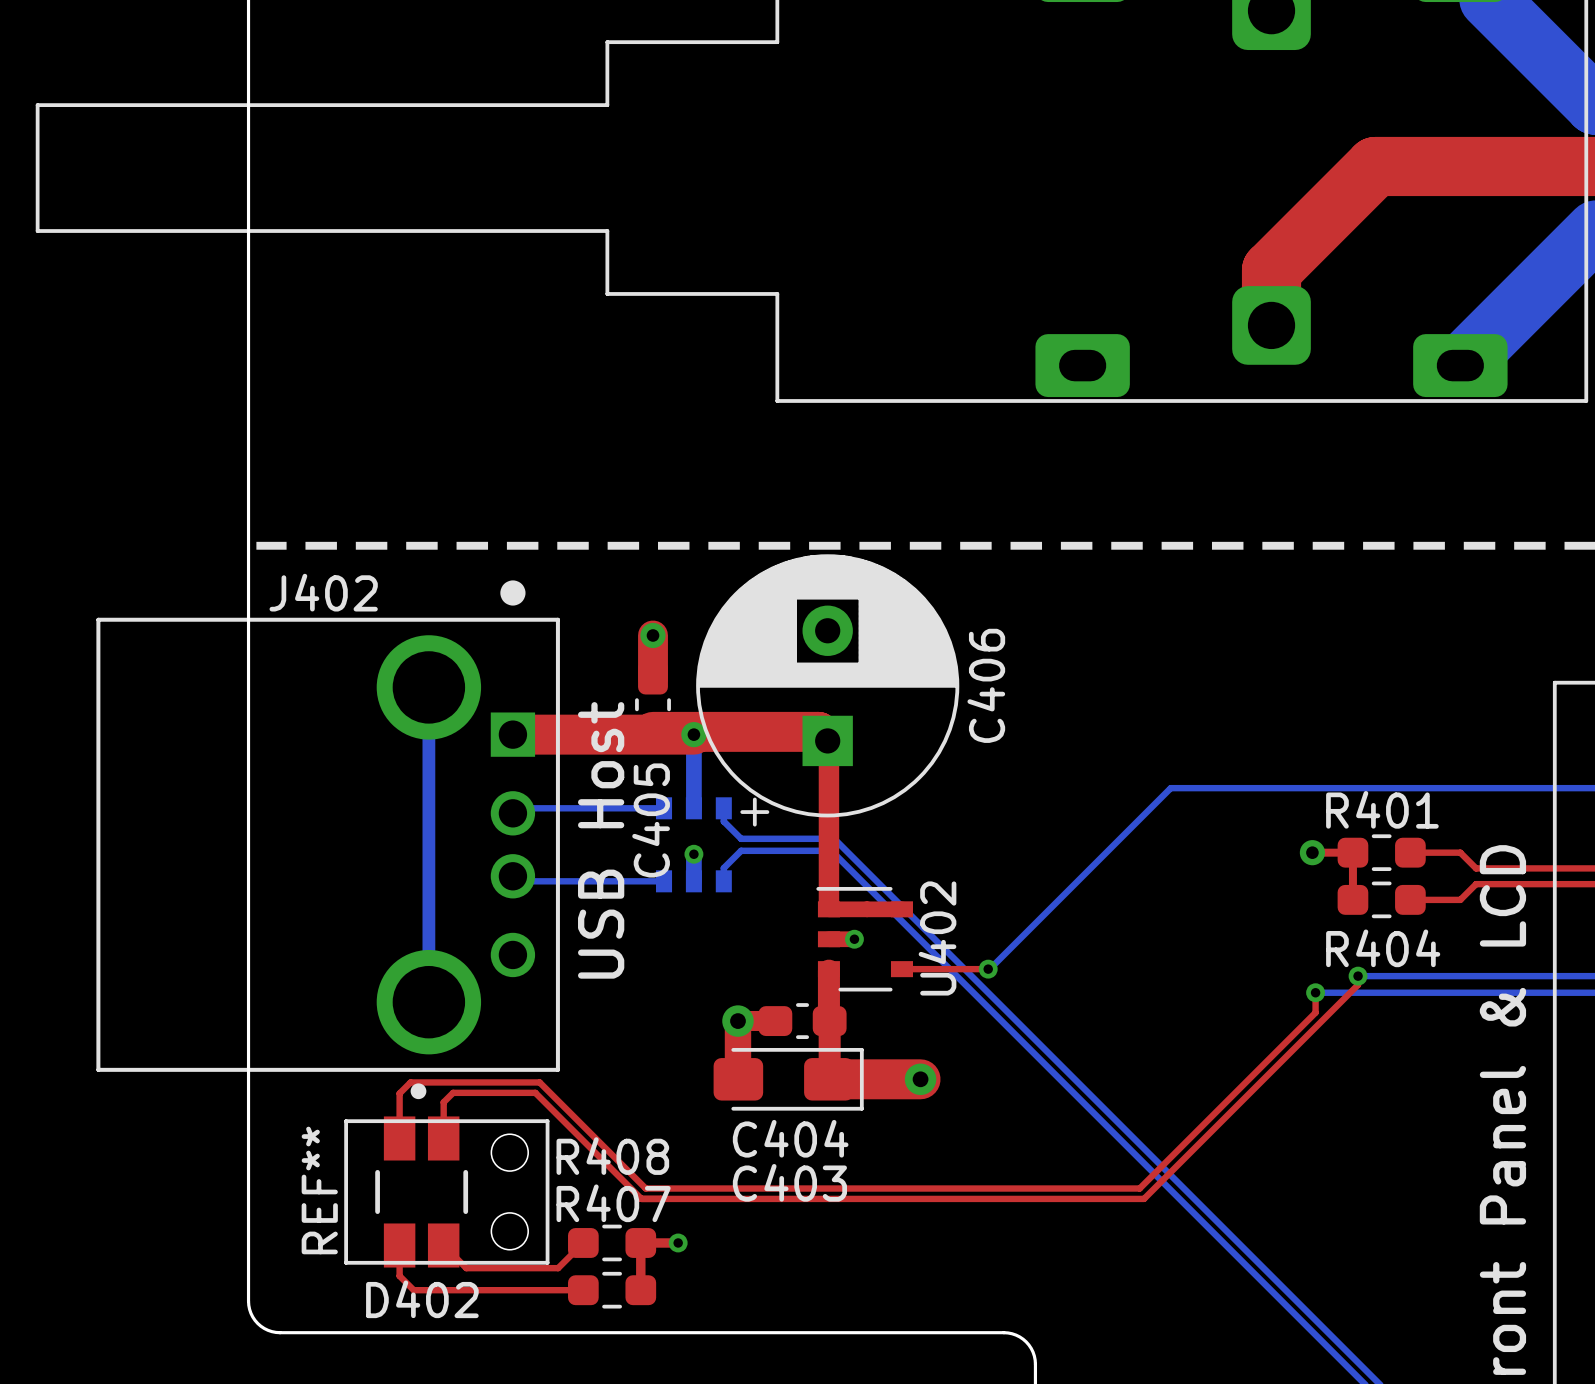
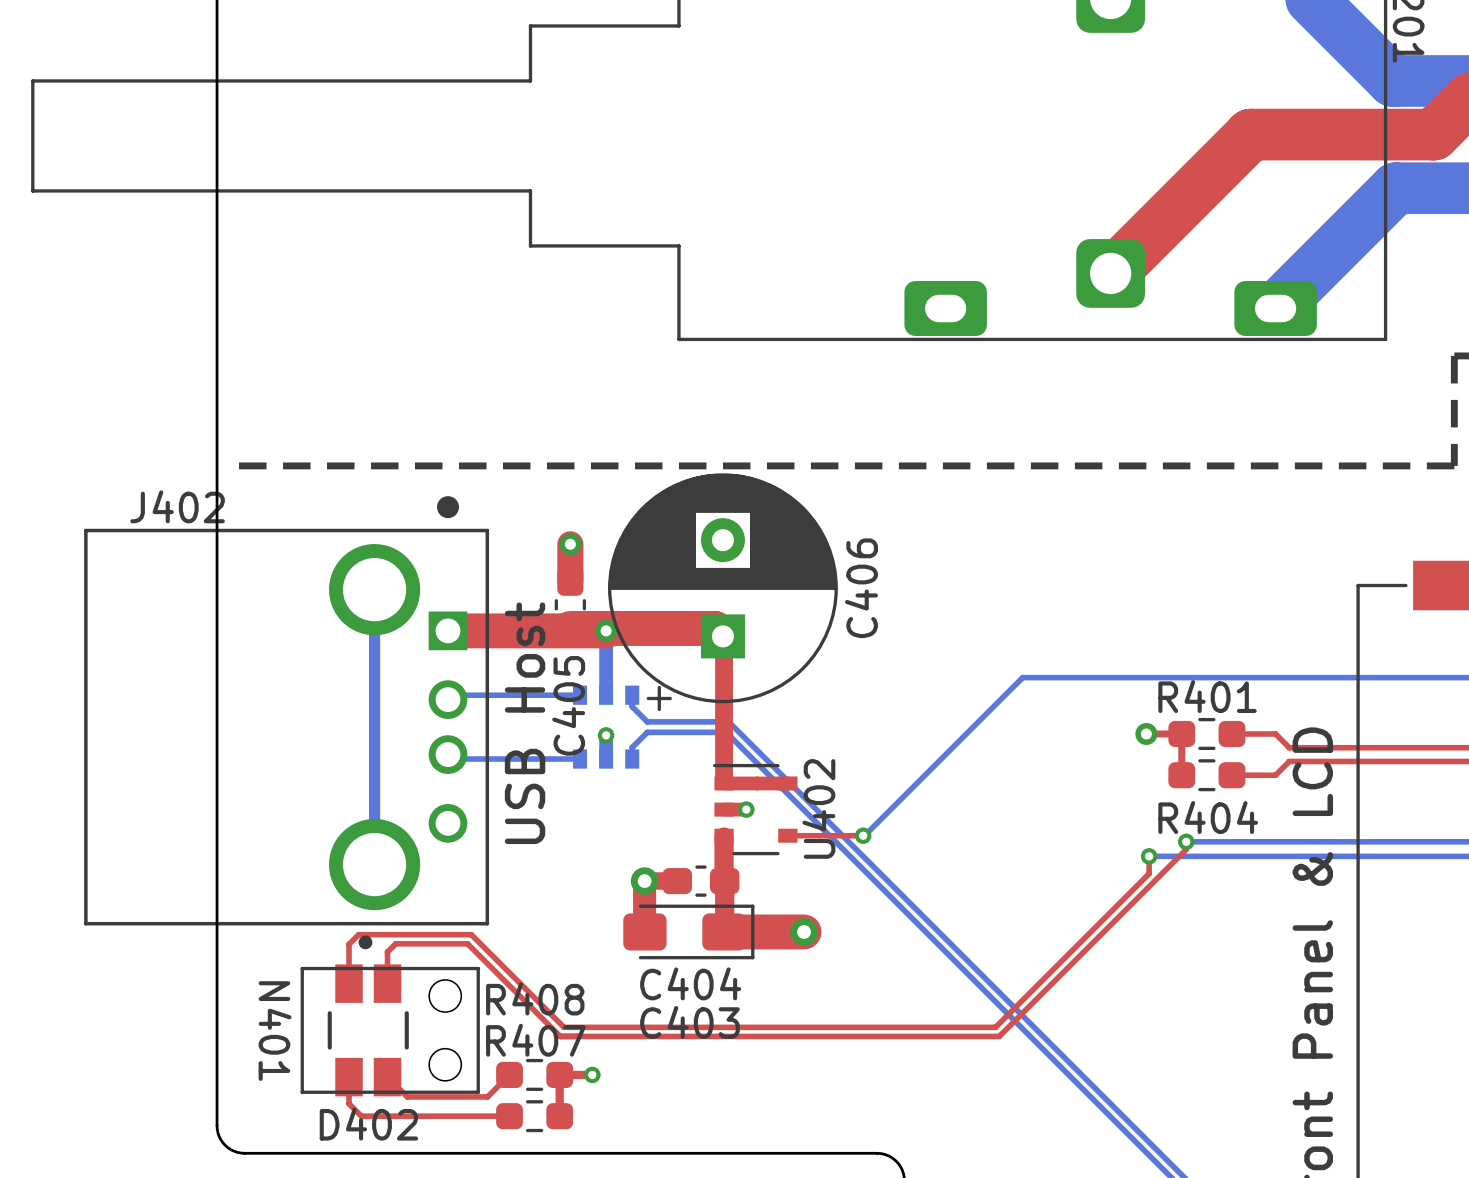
top track: (1432, 166) (1375, 166) (1271, 270) (1271, 325) -> (1250, 134) (1110, 273)
J402 name position: J402 (323, 592) -> J402 (177, 506)
REF** name: REF** (319, 1190) -> N401 (275, 1031)

